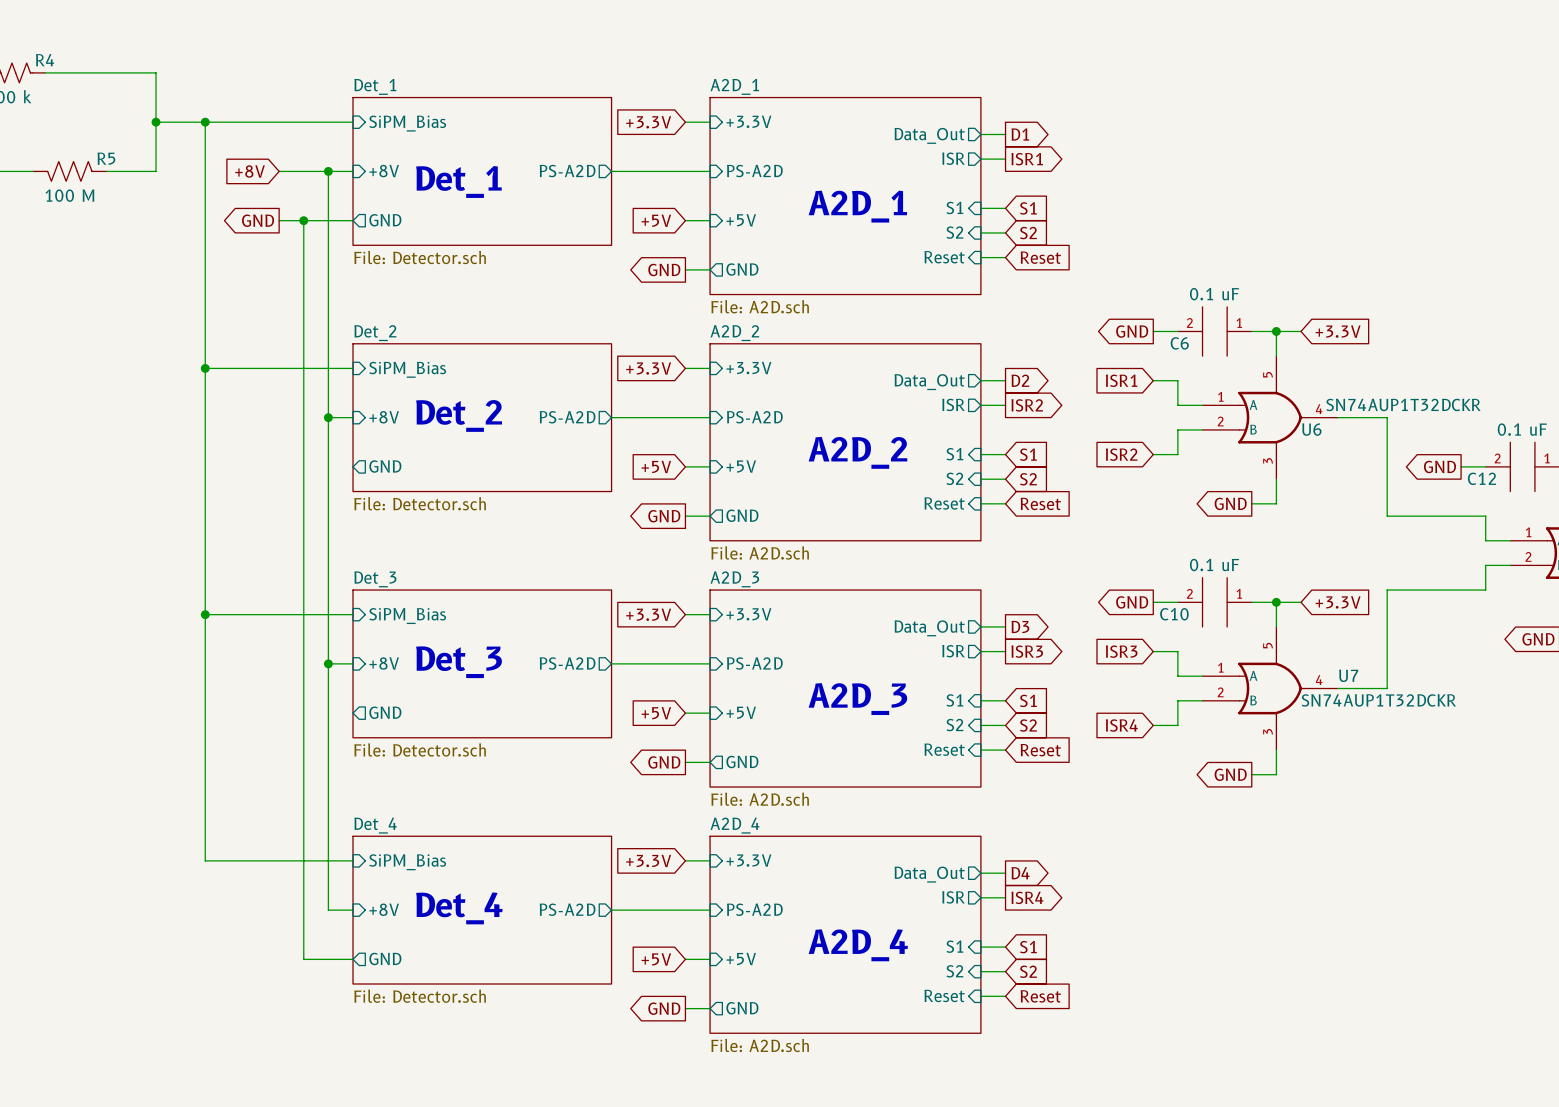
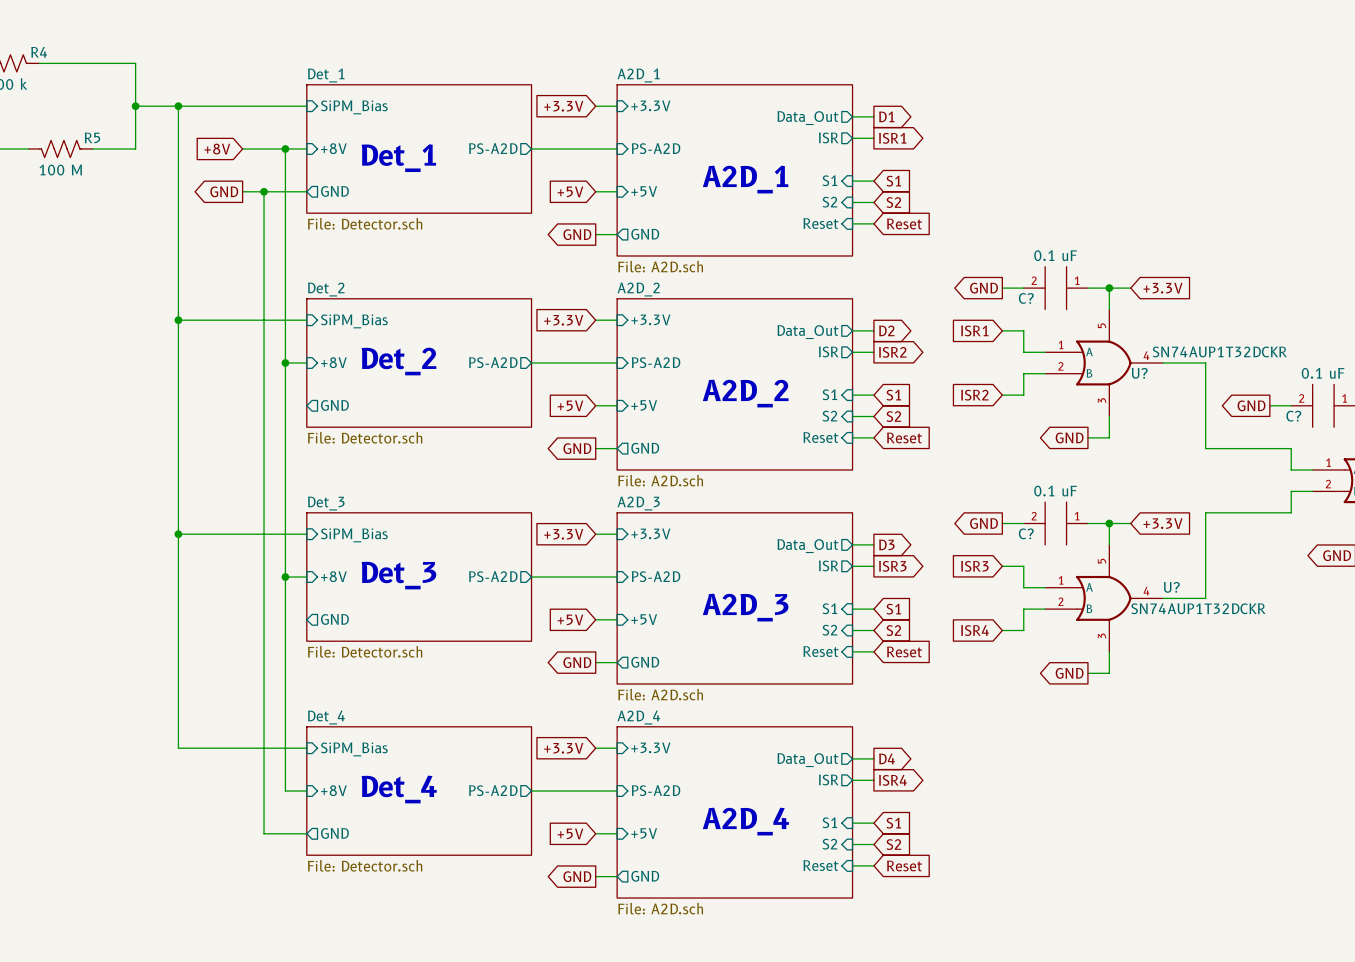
C6 name: C6 (1179, 343) -> C? (1026, 298)
U6 name: U6 (1311, 429) -> U? (1139, 373)
C12 name: C12 (1481, 478) -> C? (1293, 416)
C10 name: C10 (1174, 614) -> C? (1026, 533)
U7 name: U7 (1348, 675) -> U? (1171, 587)

